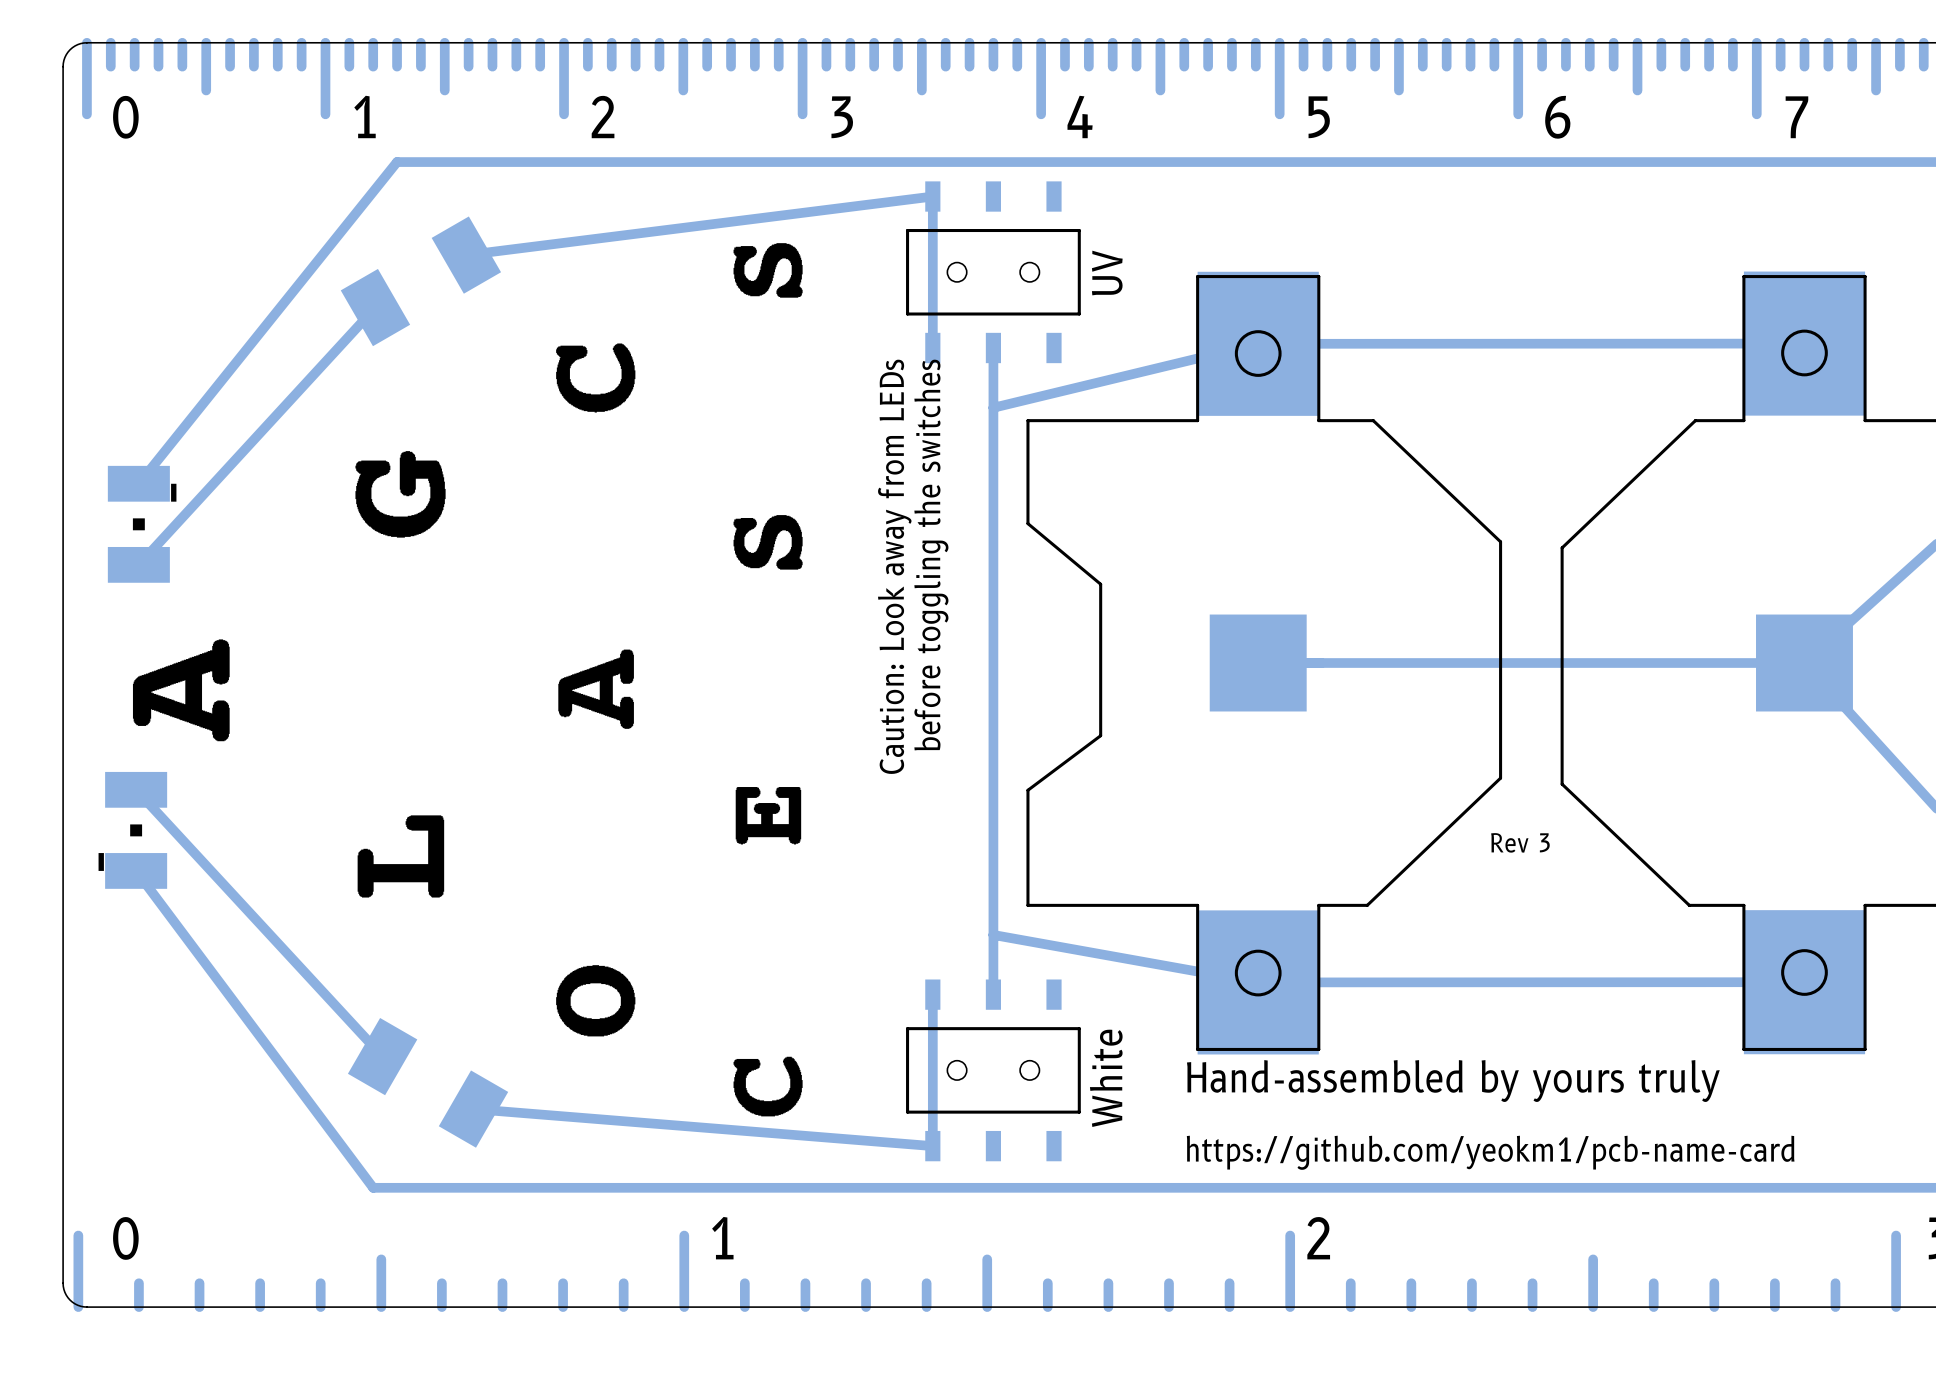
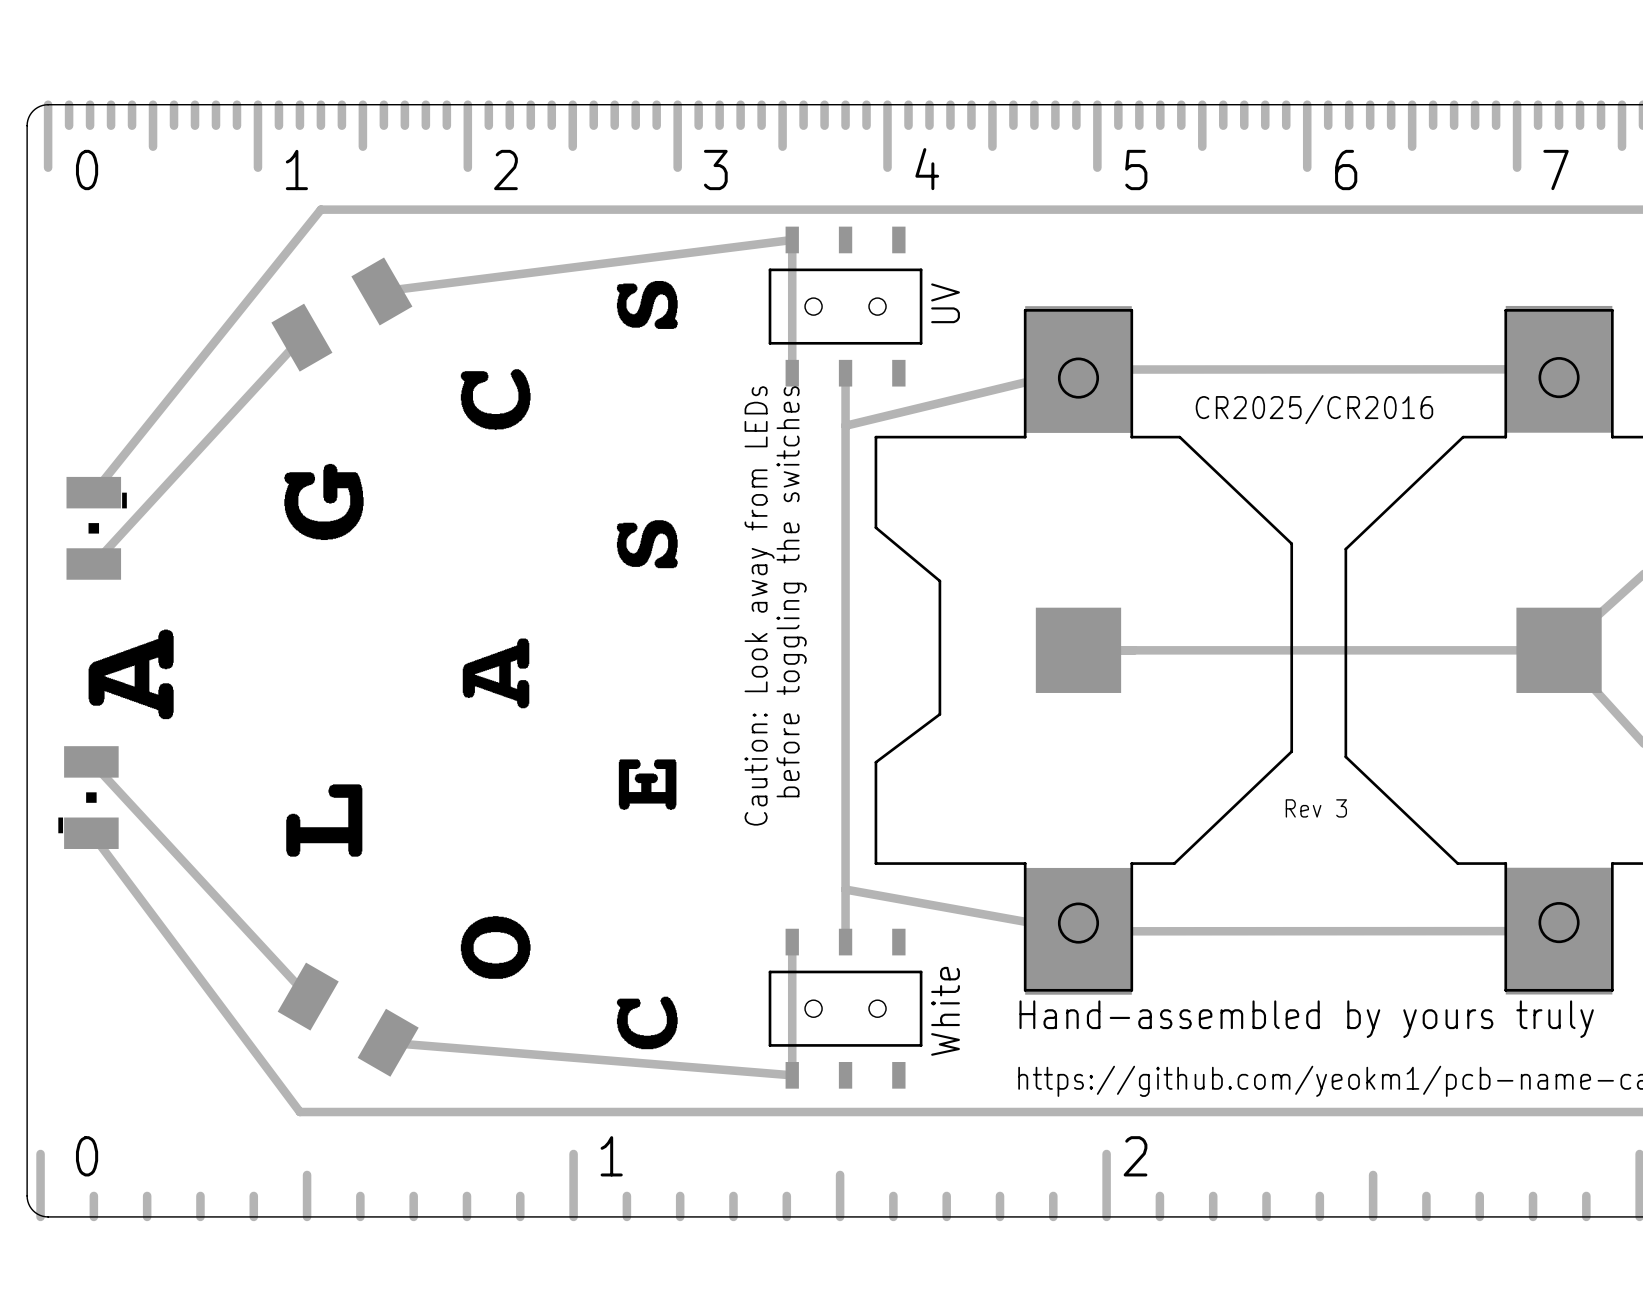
text: none -> CR2025/CR2016 (1314, 409)

